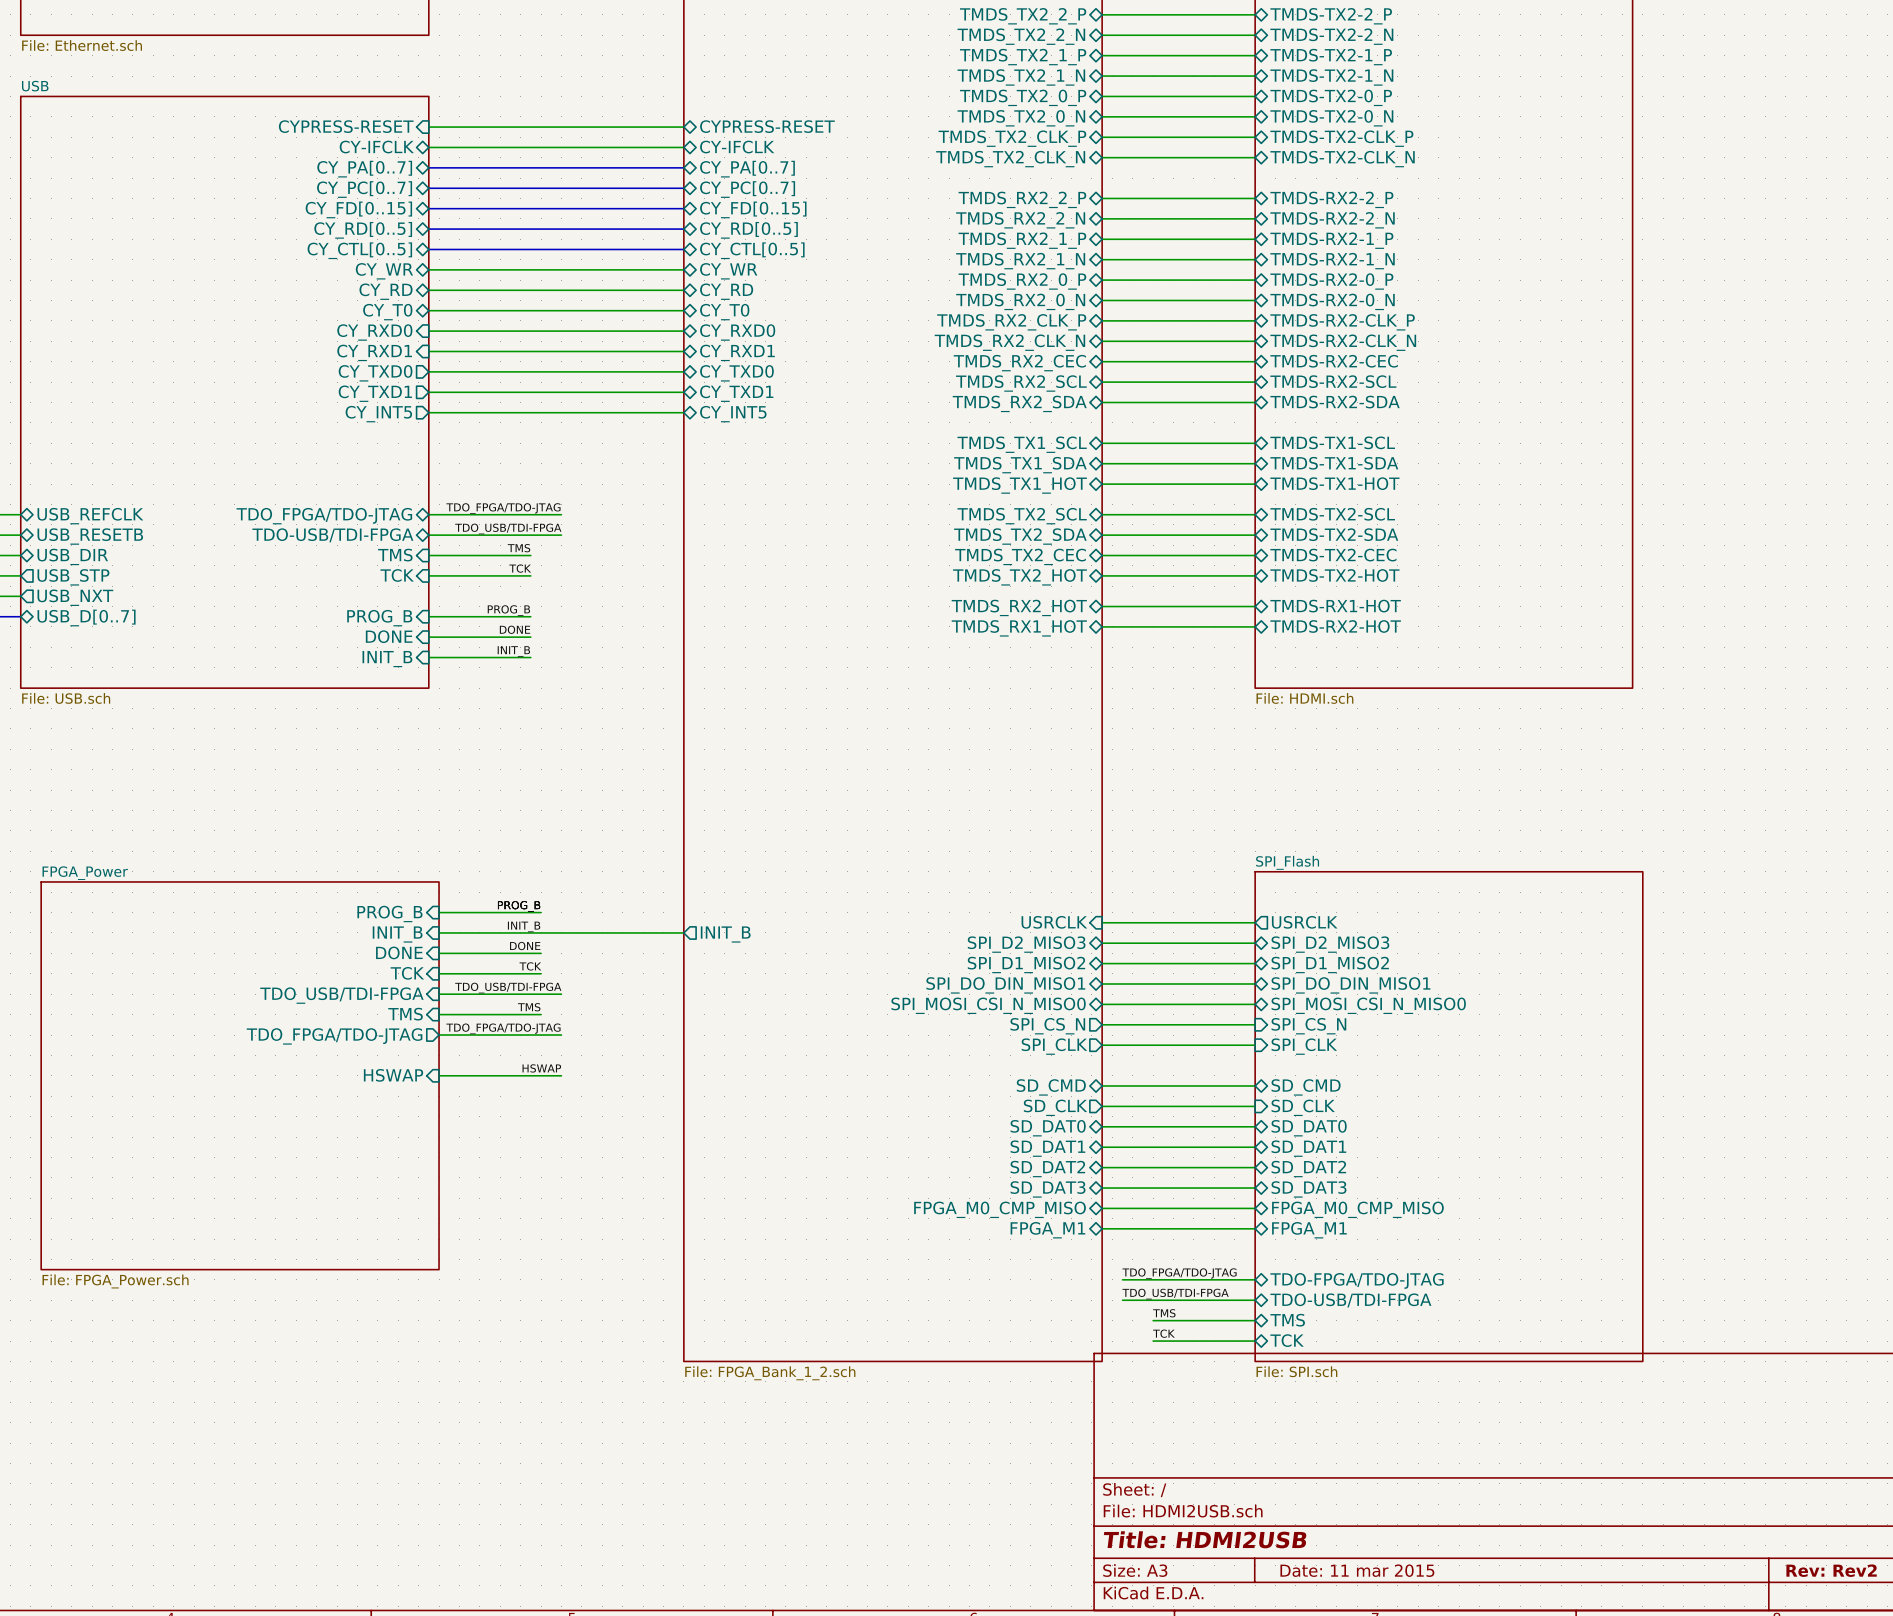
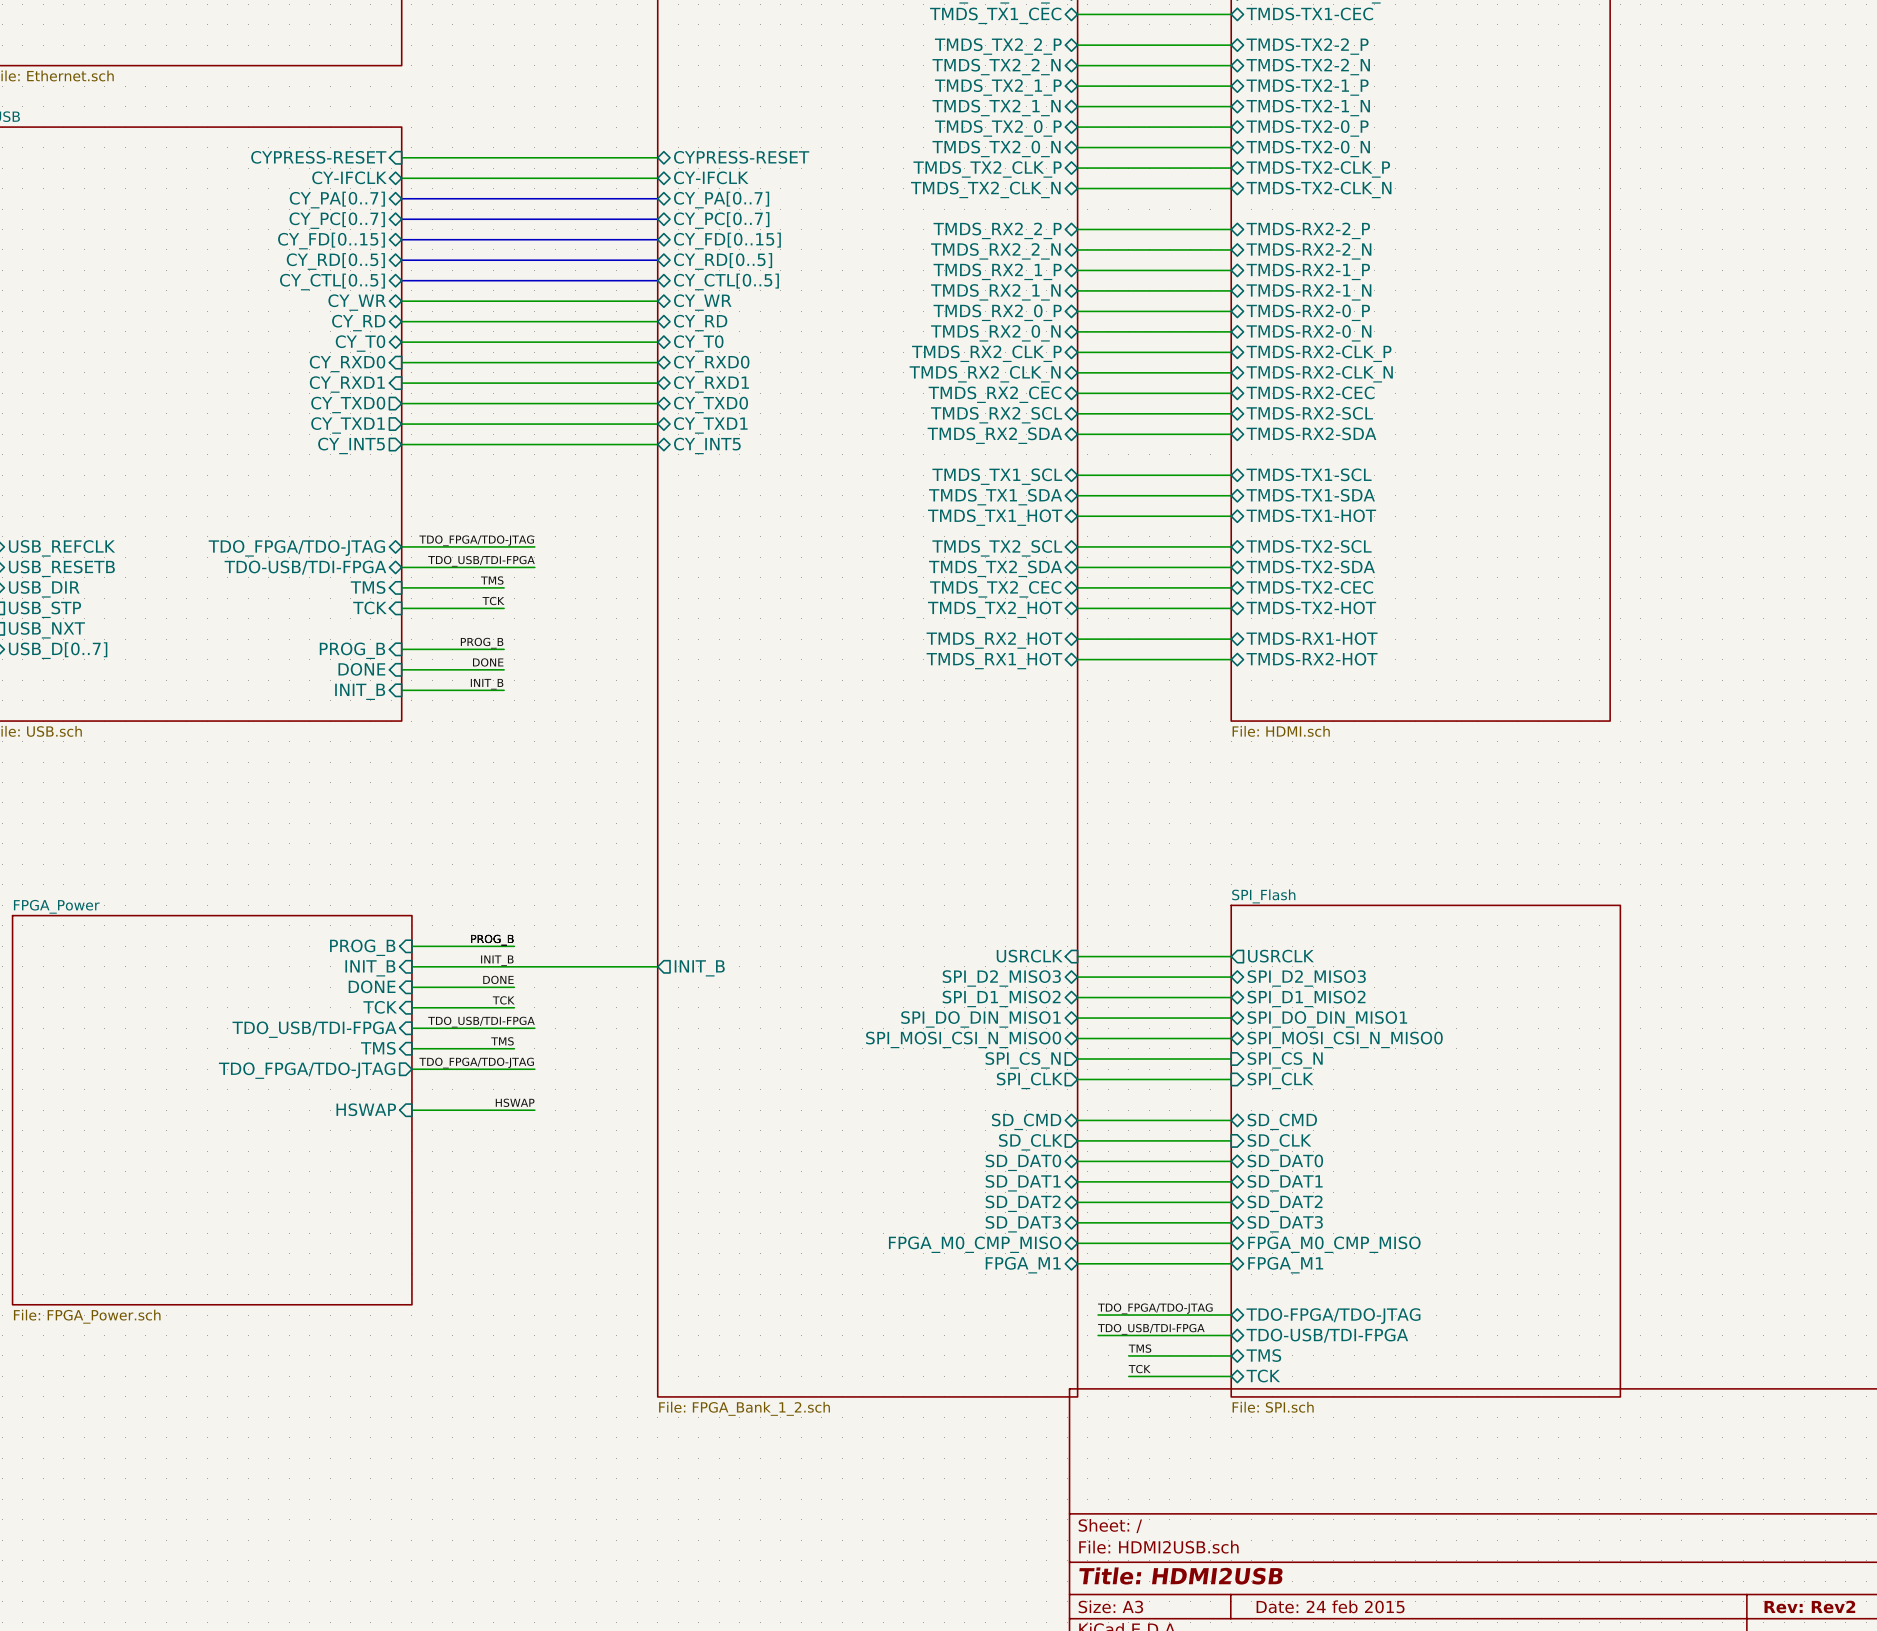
title block: Date: 11 mar 2015 (1357, 1570) -> Date: 24 feb 2015 (1330, 1606)

